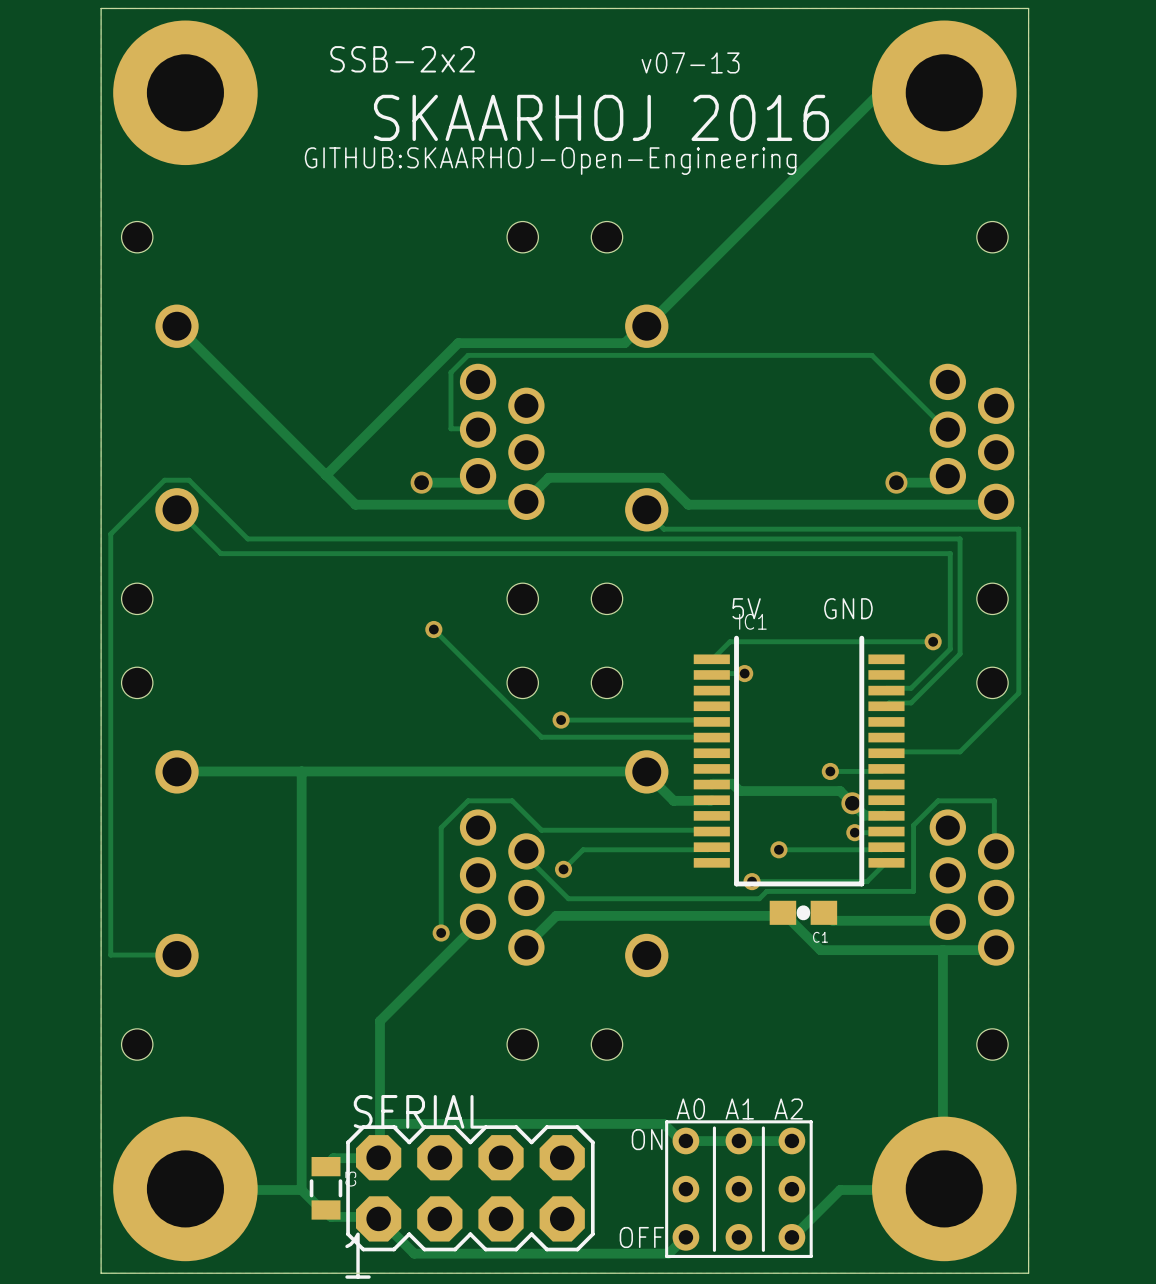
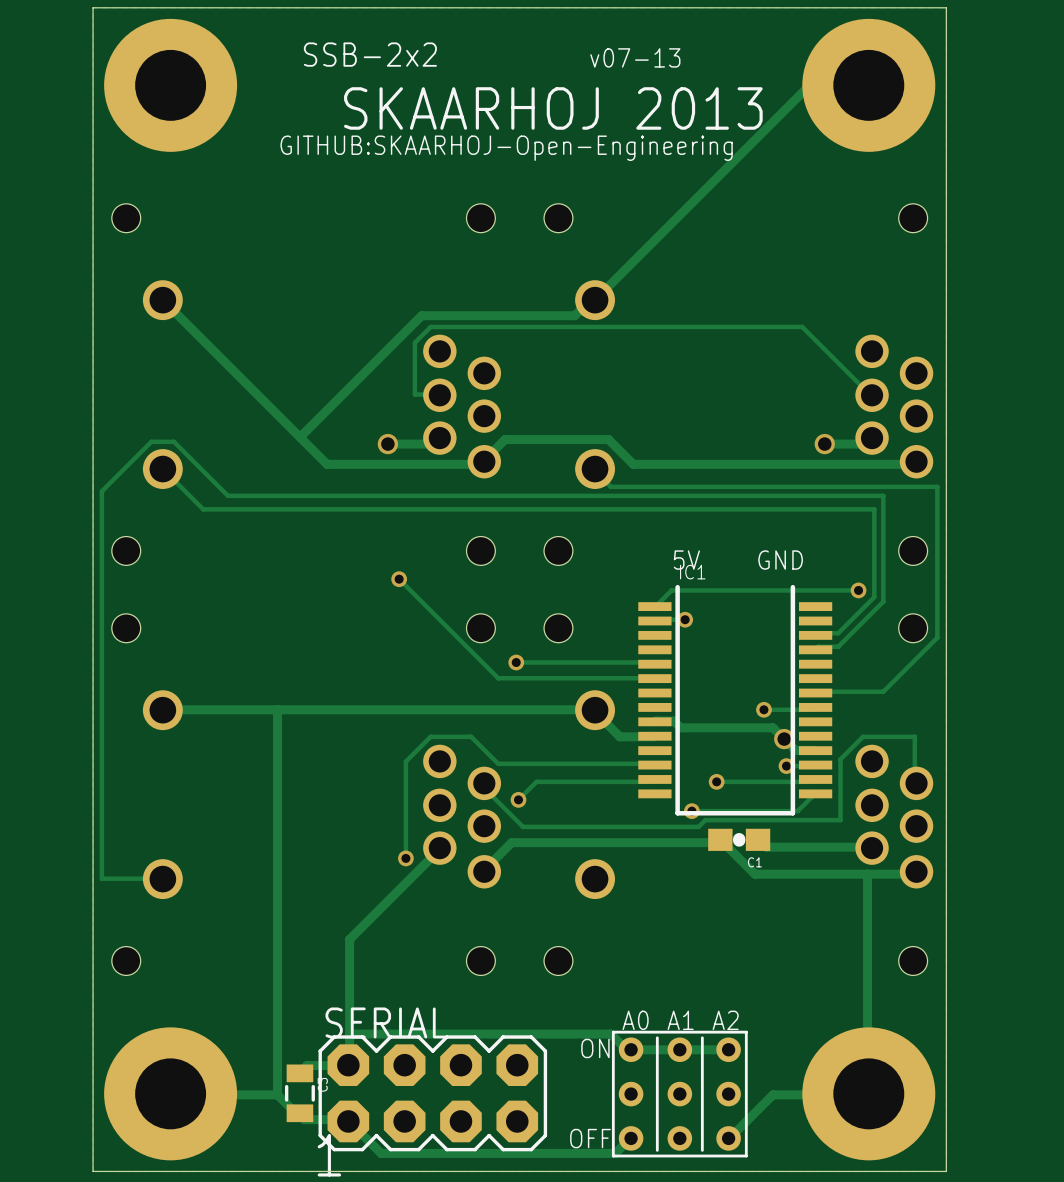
text: SKAARHOJ 2016 (601, 117) -> SKAARHOJ 2013 (553, 108)

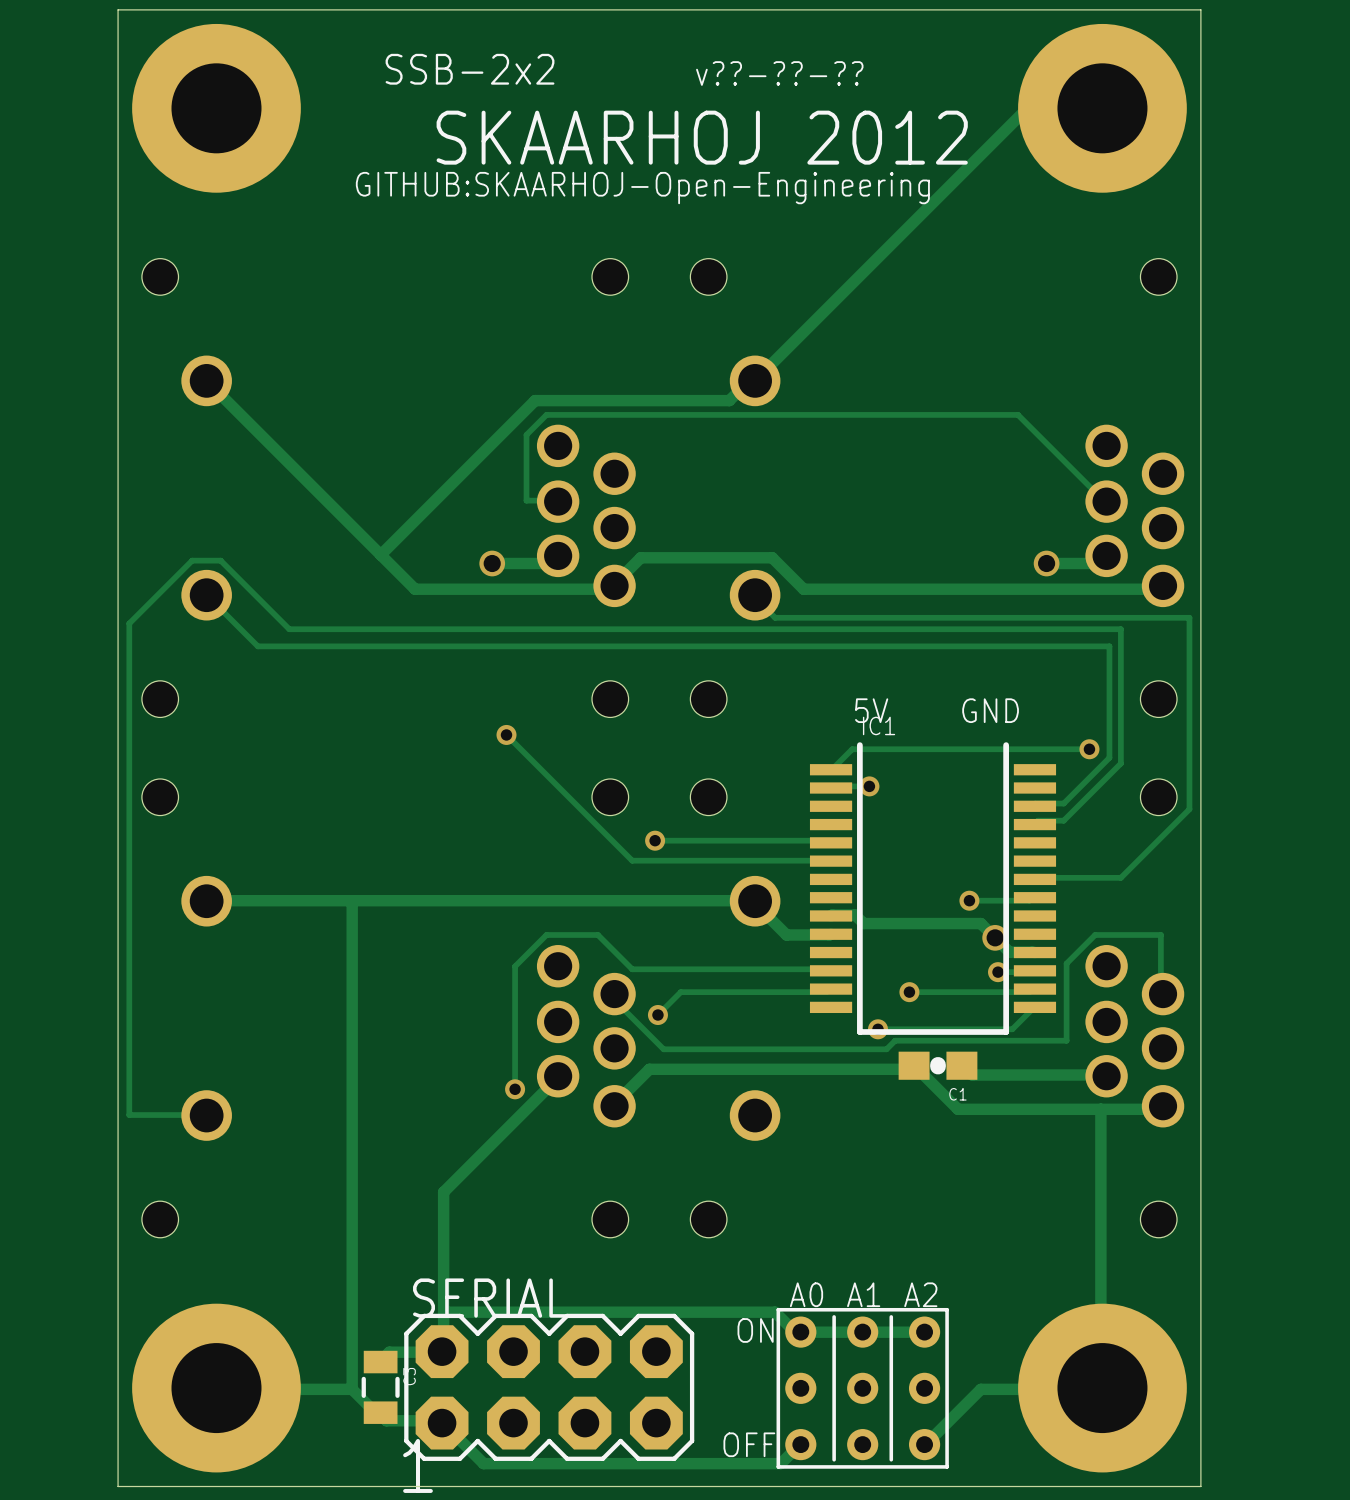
text: v07-13 (635, 57) -> v??-??-?? (779, 73)
text: SKAARHOJ 2013 (553, 108) -> SKAARHOJ 2012 (702, 137)

